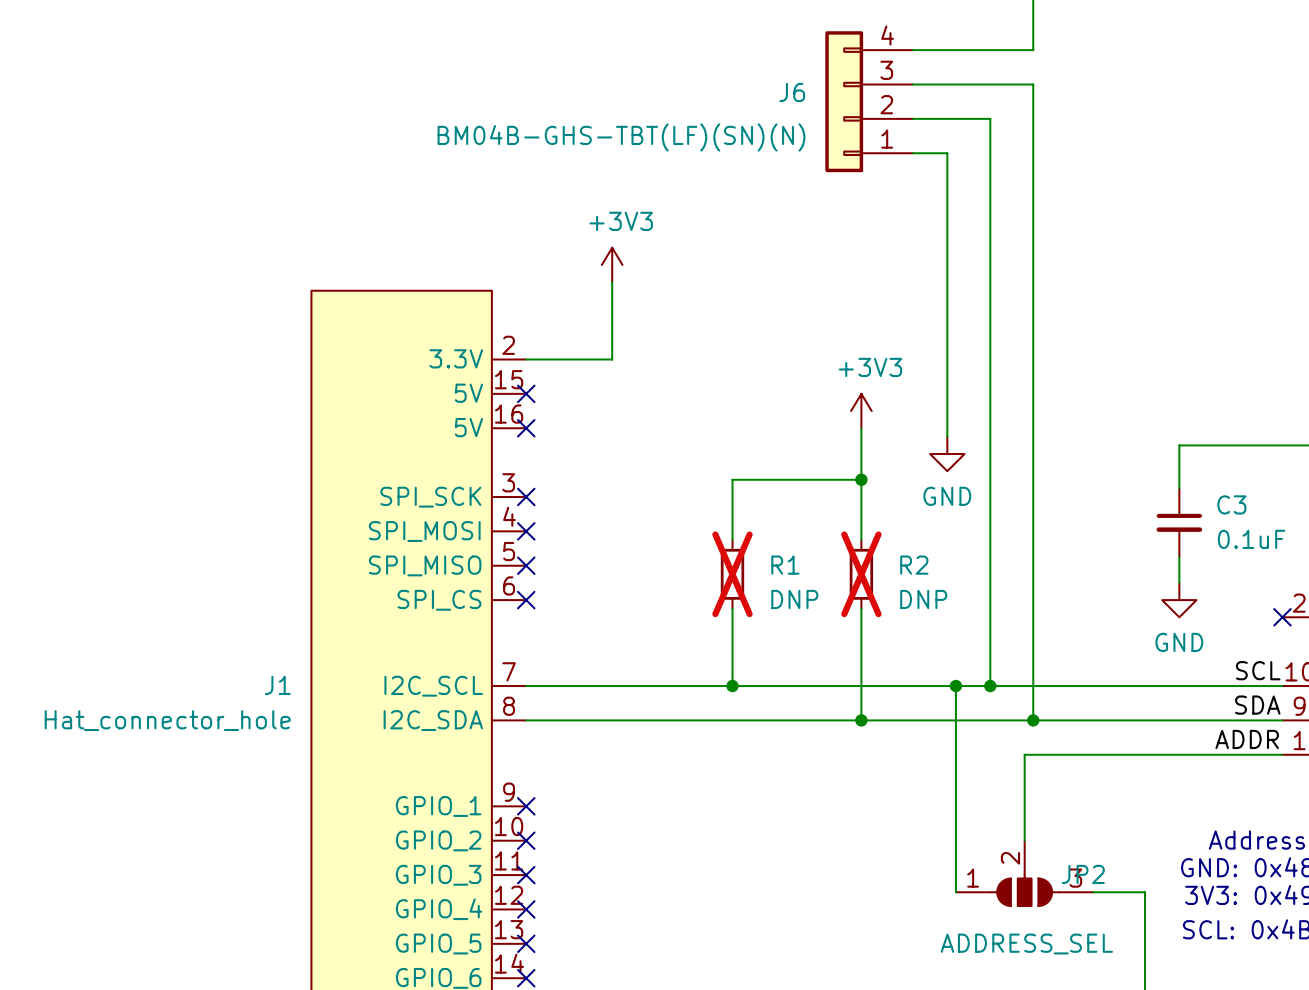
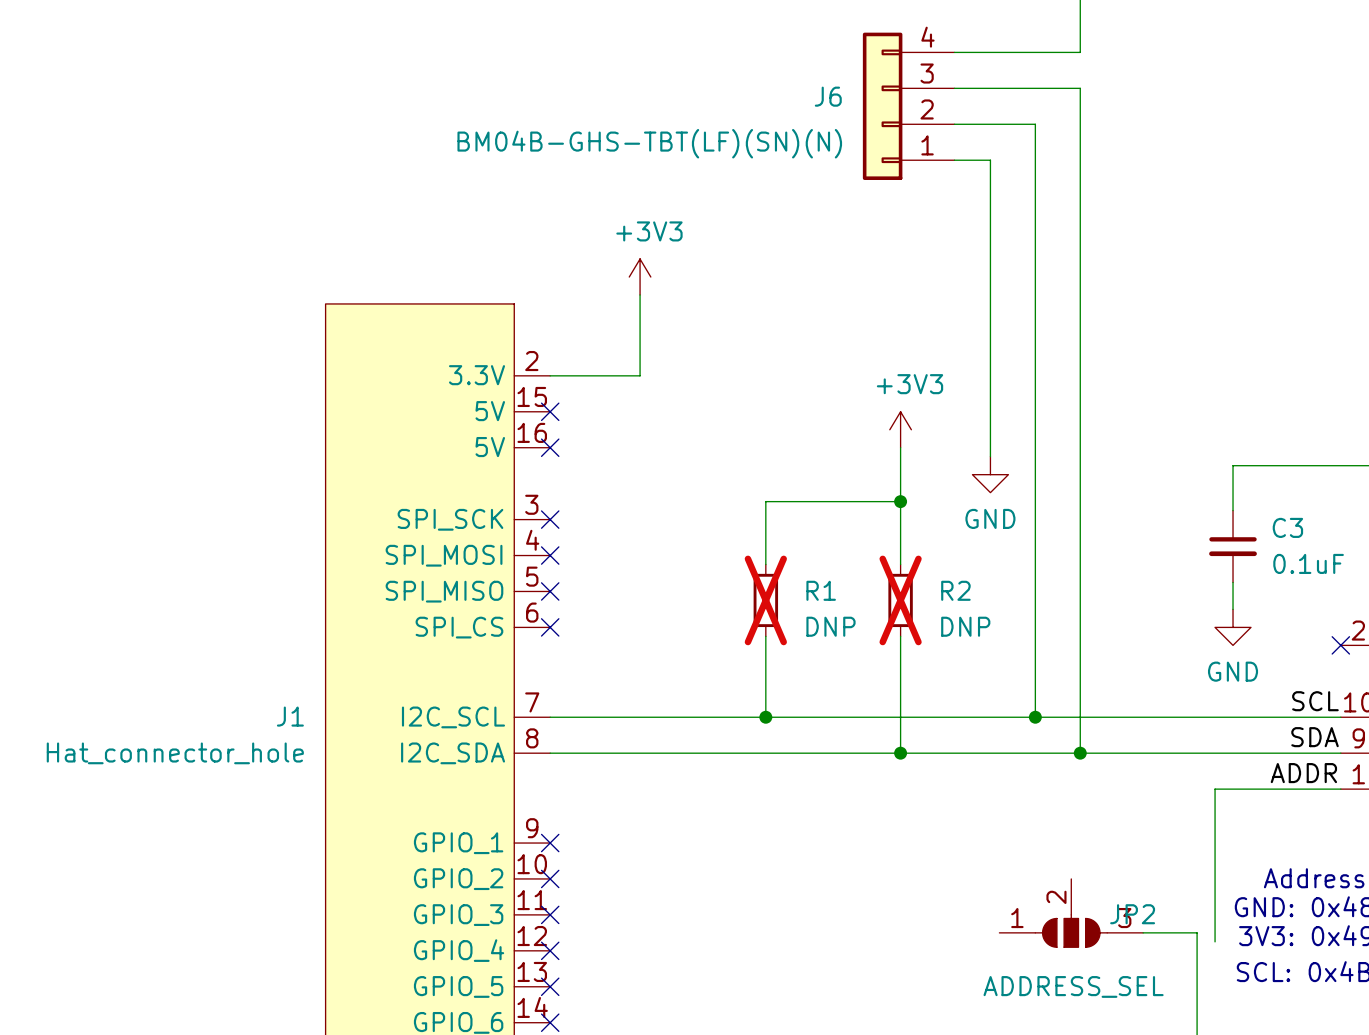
wire: (955, 686) (955, 892) -> none
junction: (955, 686) -> none
wire: (1162, 754) (1024, 754) (1024, 840) -> (1215, 789) (1215, 941)

